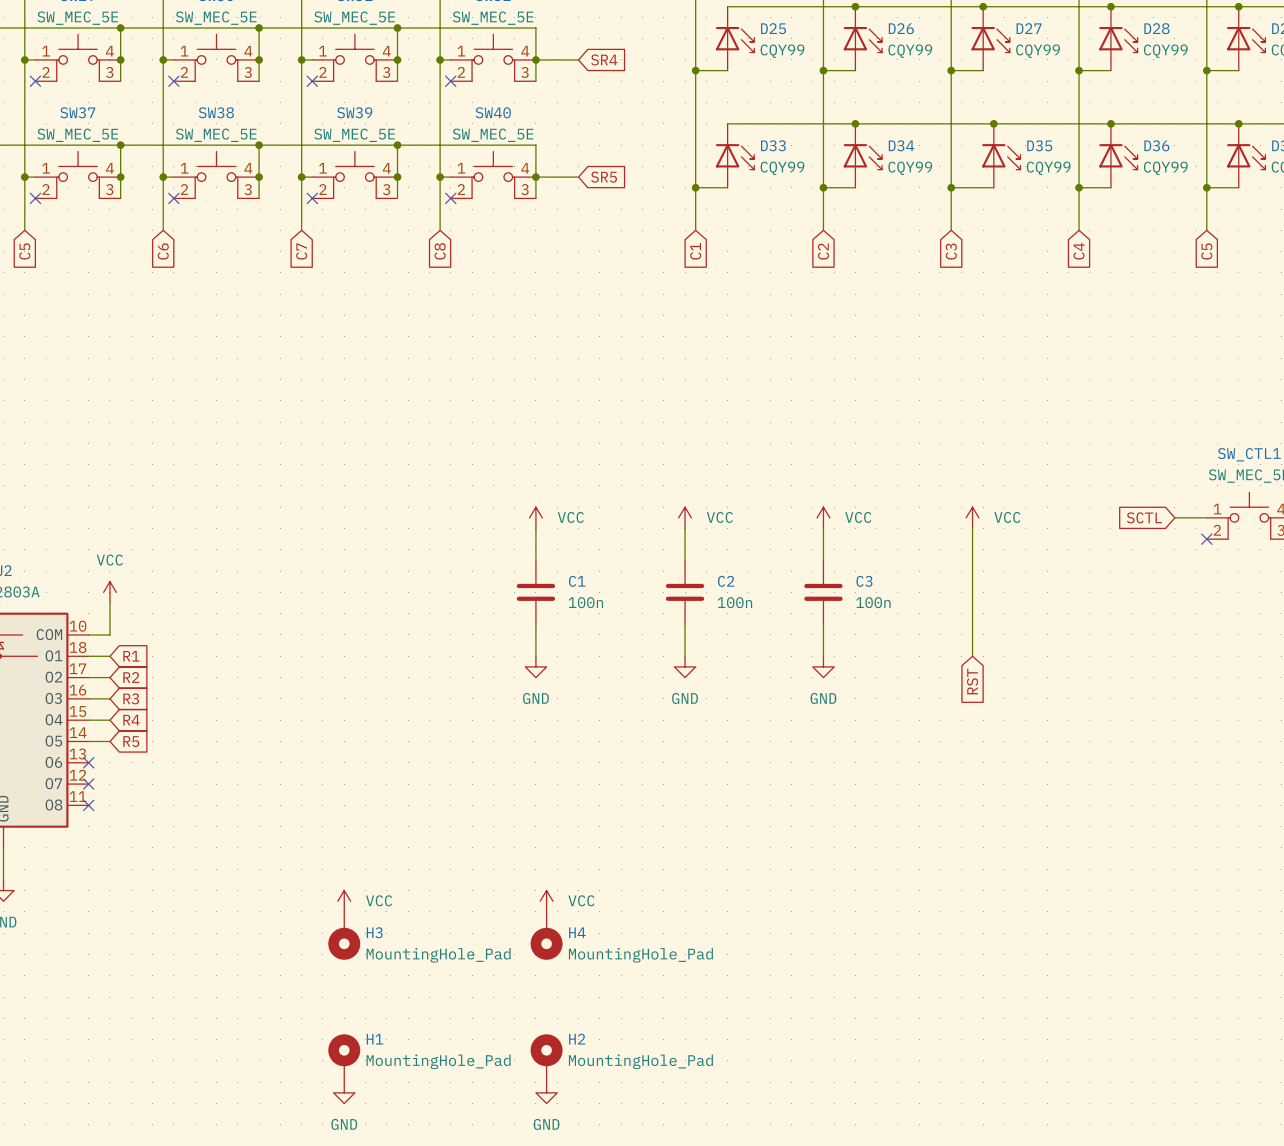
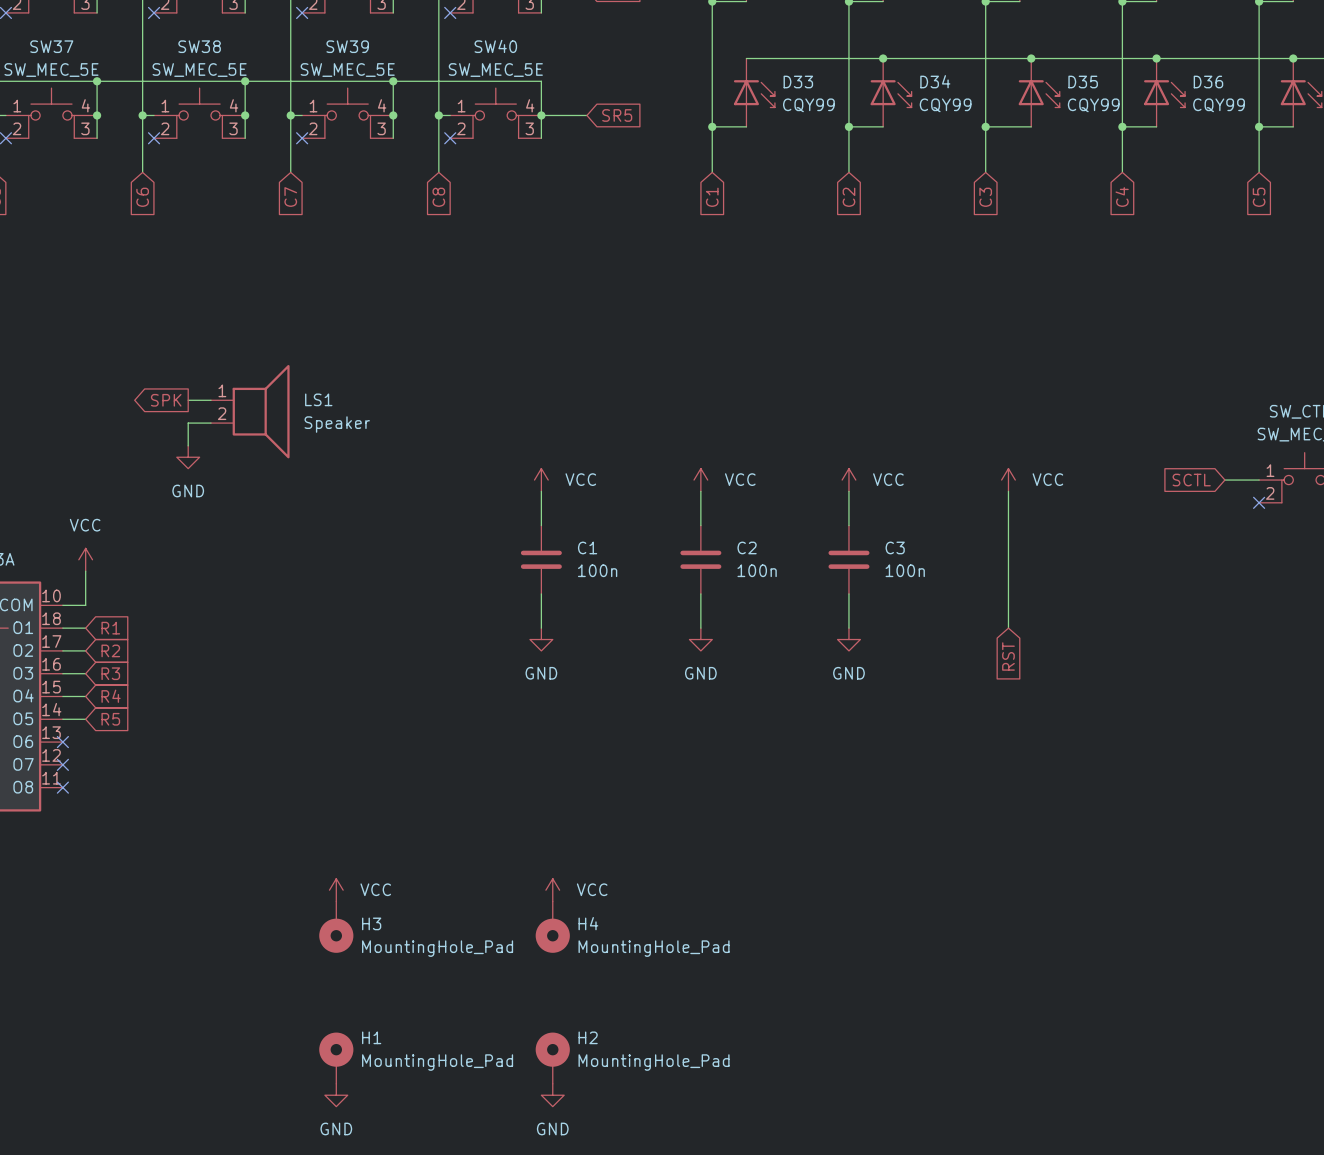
global label: none -> SPK (166, 400)
wire: none -> (188, 400) (210, 400)
LS1: none -> Speaker (250, 411)
wire: none -> (210, 423) (188, 423) (188, 445)
power symbol: none -> GND (188, 457)

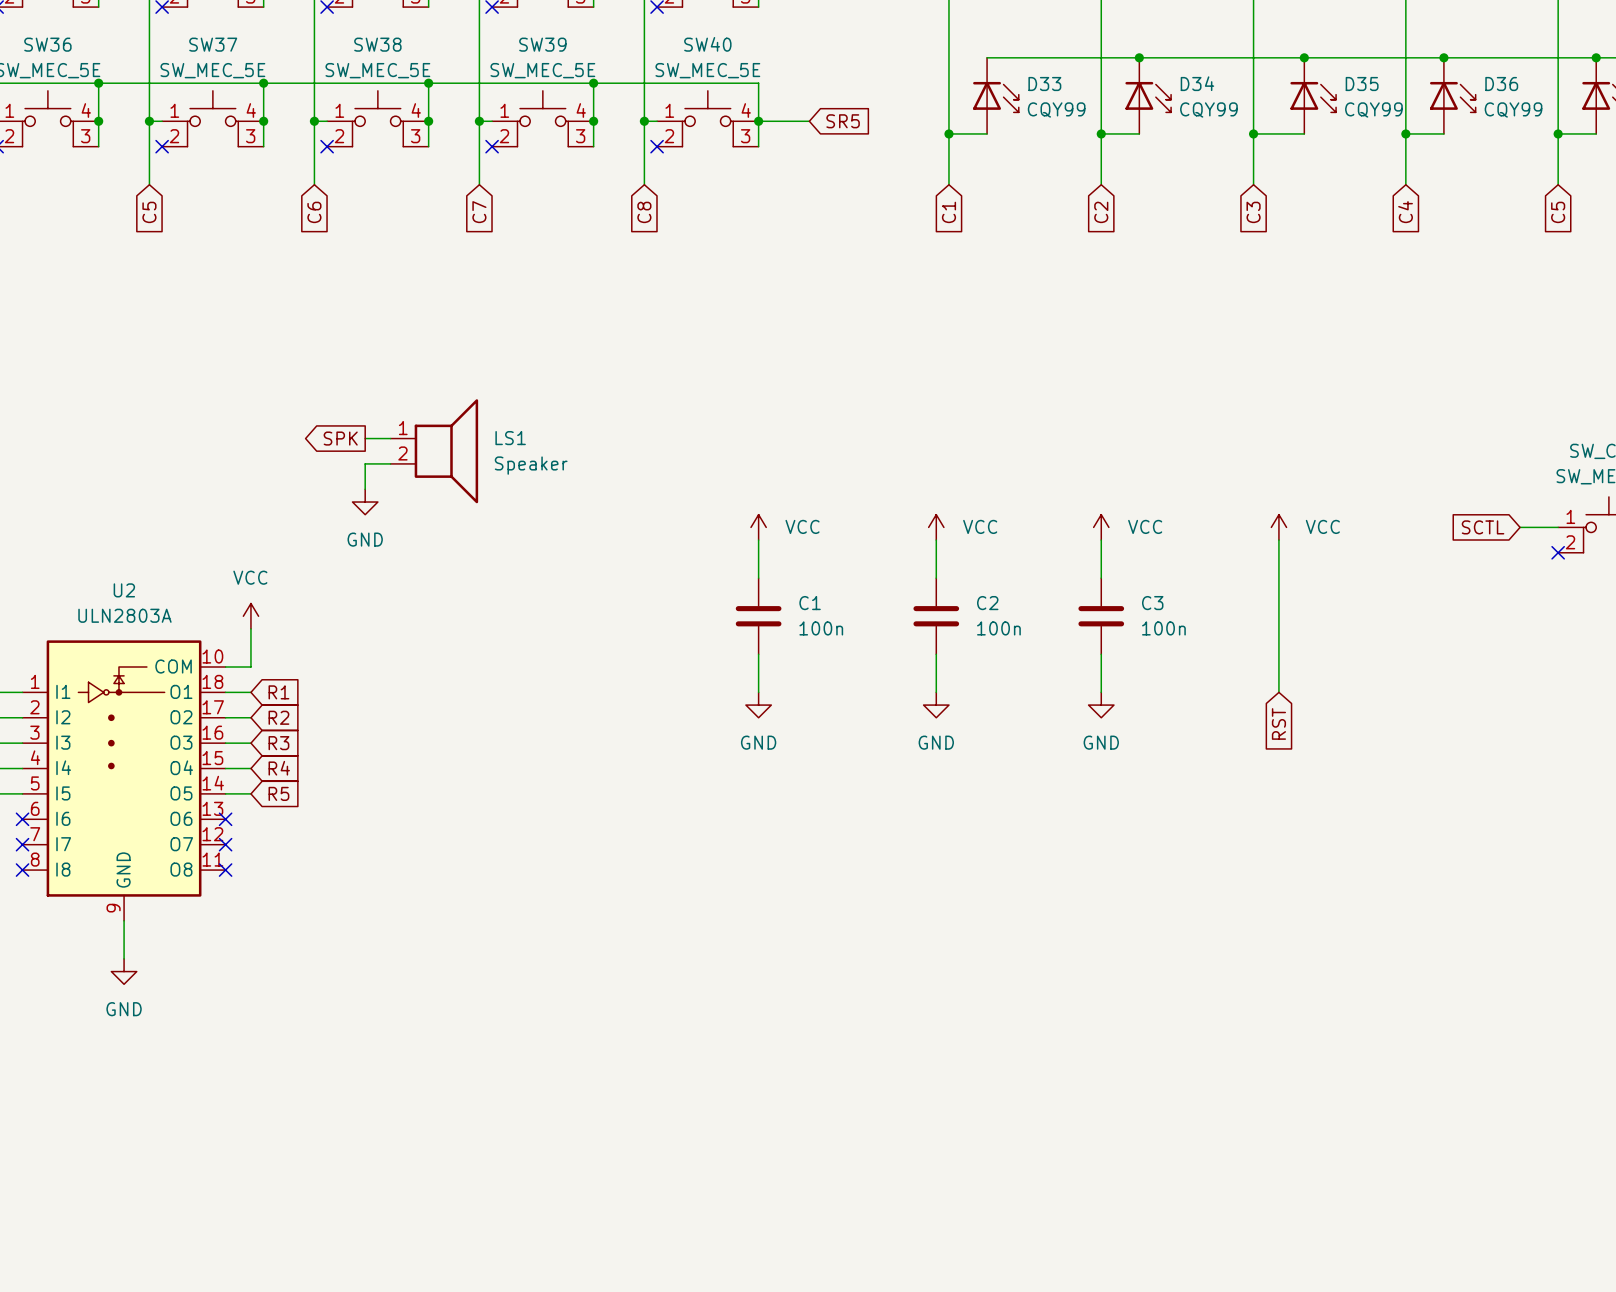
power symbol: VCC (336, 890) -> none
power symbol: VCC (552, 890) -> none
H3: MountingHole_Pad (336, 927) -> none
H4: MountingHole_Pad (552, 927) -> none
H1: MountingHole_Pad (336, 1058) -> none
H2: MountingHole_Pad (552, 1058) -> none
power symbol: GND (336, 1095) -> none
power symbol: GND (552, 1095) -> none

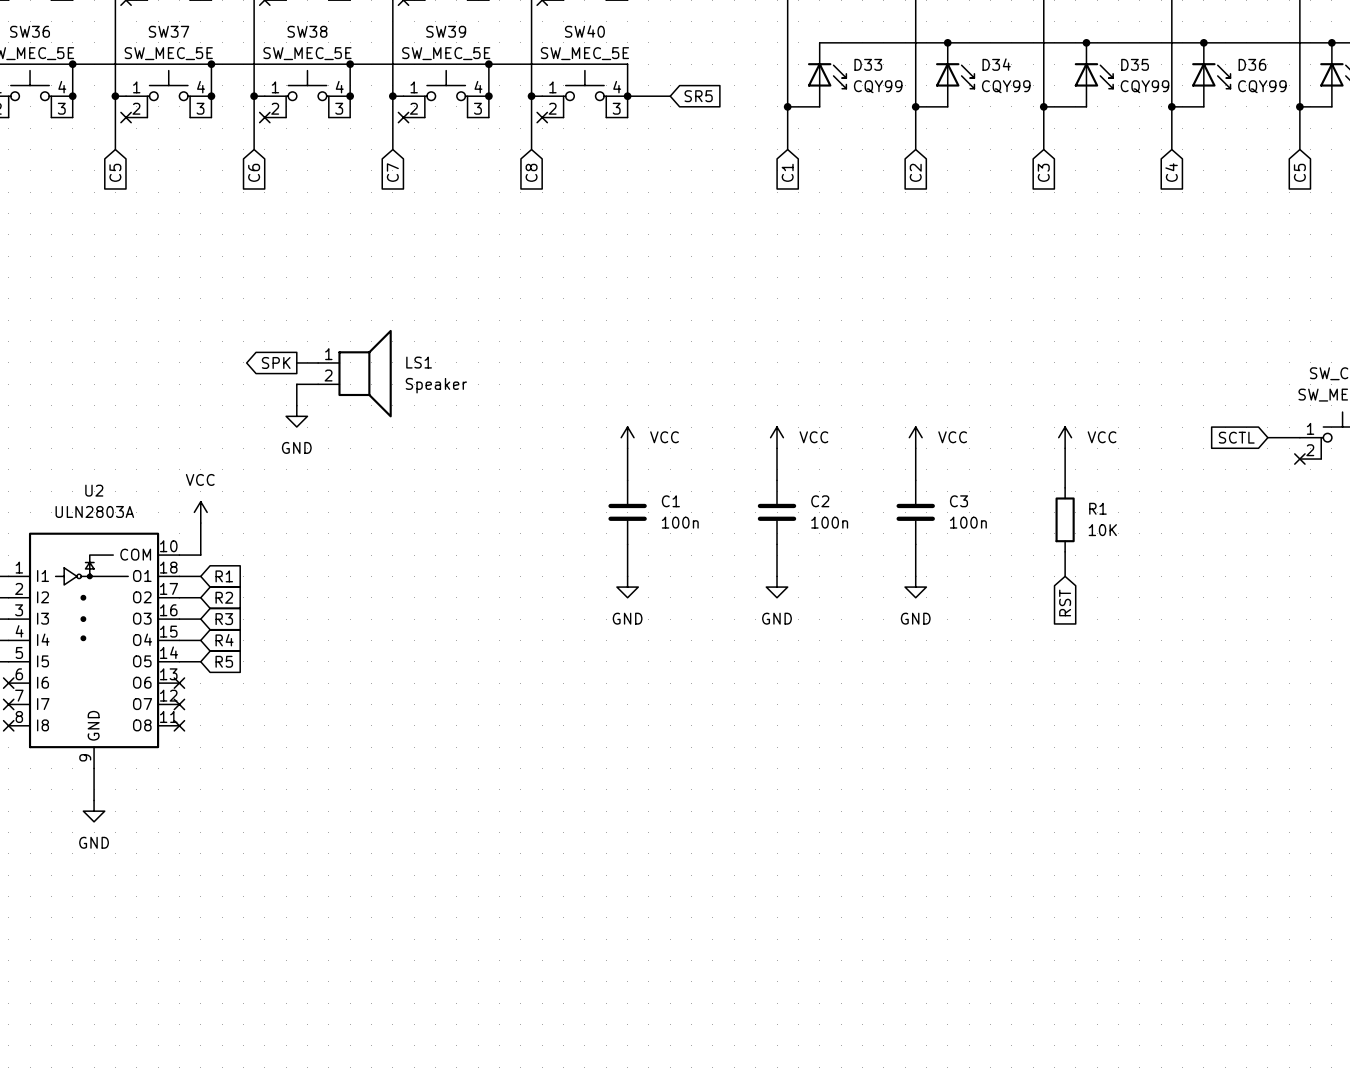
wire: (1278, 587) (1278, 663) -> none
R1: none -> 10K (1065, 519)

